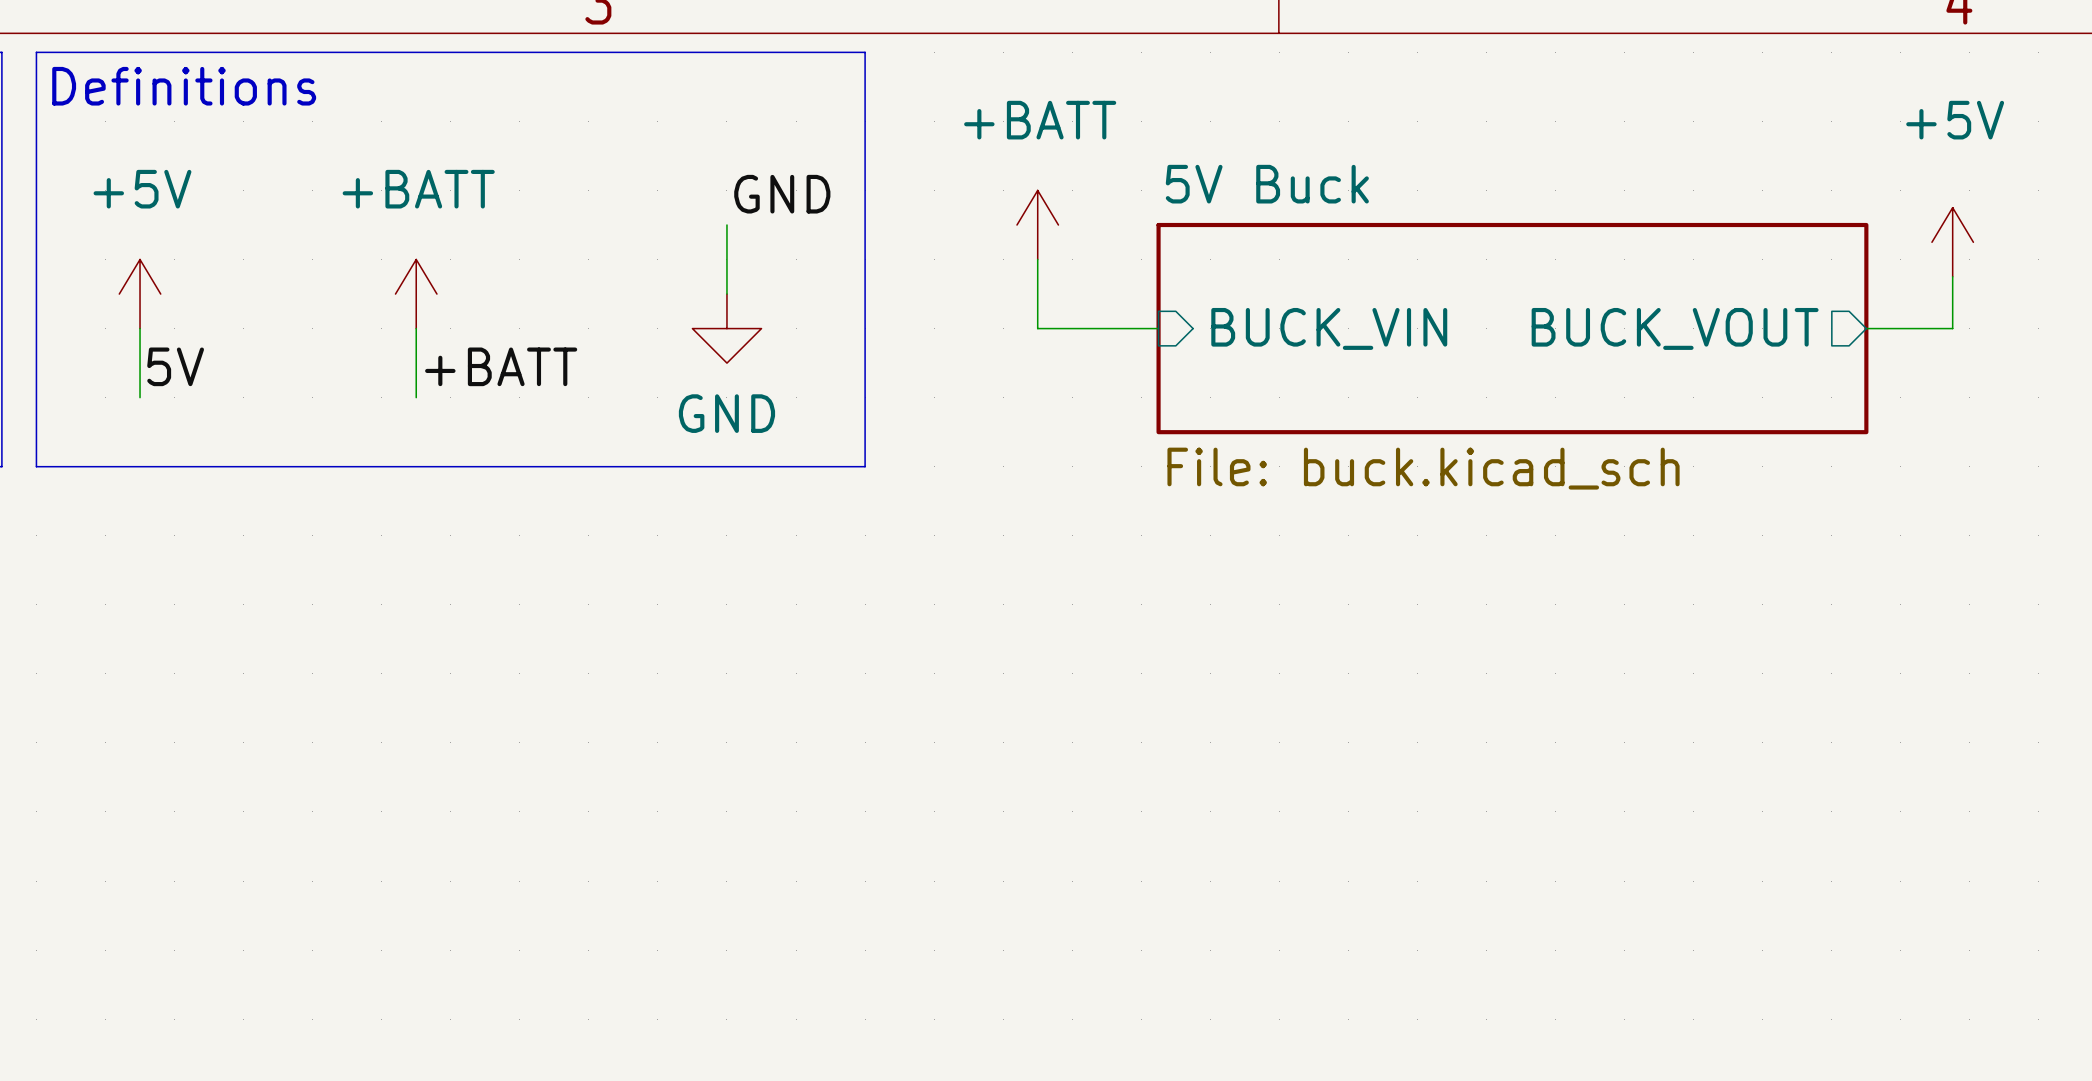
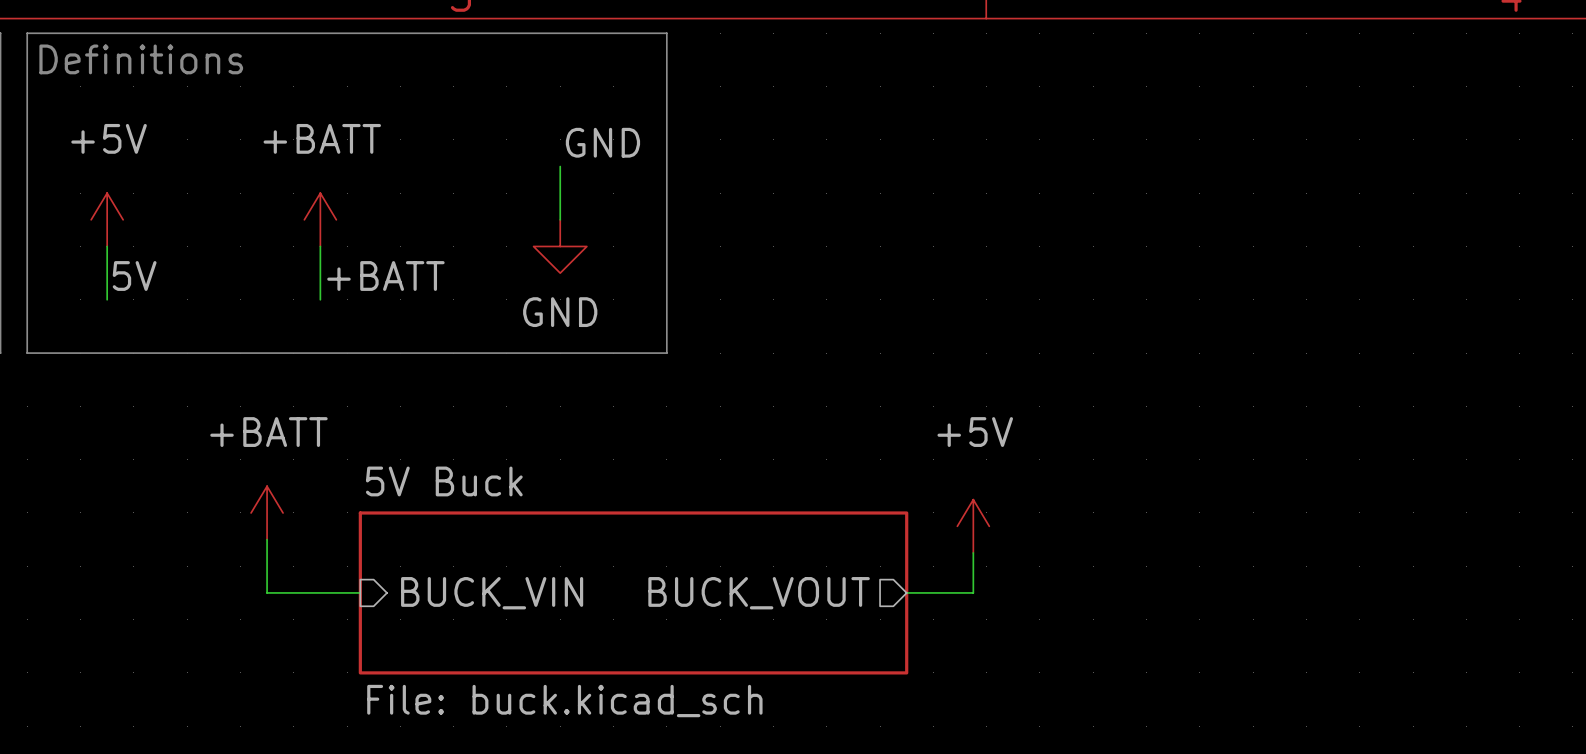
power symbol: +BATT (1037, 225) -> none
power symbol: +5V (1952, 242) -> none
wire: (1037, 259) (1037, 328) (1158, 328) -> none
wire: (1952, 276) (1952, 328) (1866, 328) -> none
sheet pin: BUCK_VIN (1329, 328) -> none
sheet 5V Buck position: (1512, 328) -> (633, 592)
sheet pin: BUCK_VOUT (1675, 328) -> none
power symbol: none -> +BATT (267, 512)
power symbol: none -> +5V (973, 526)
wire: none -> (267, 539) (267, 592) (360, 592)
wire: none -> (973, 552) (973, 592) (906, 592)
sheet pin: none -> BUCK_VIN (492, 593)
sheet pin: none -> BUCK_VOUT (759, 593)

